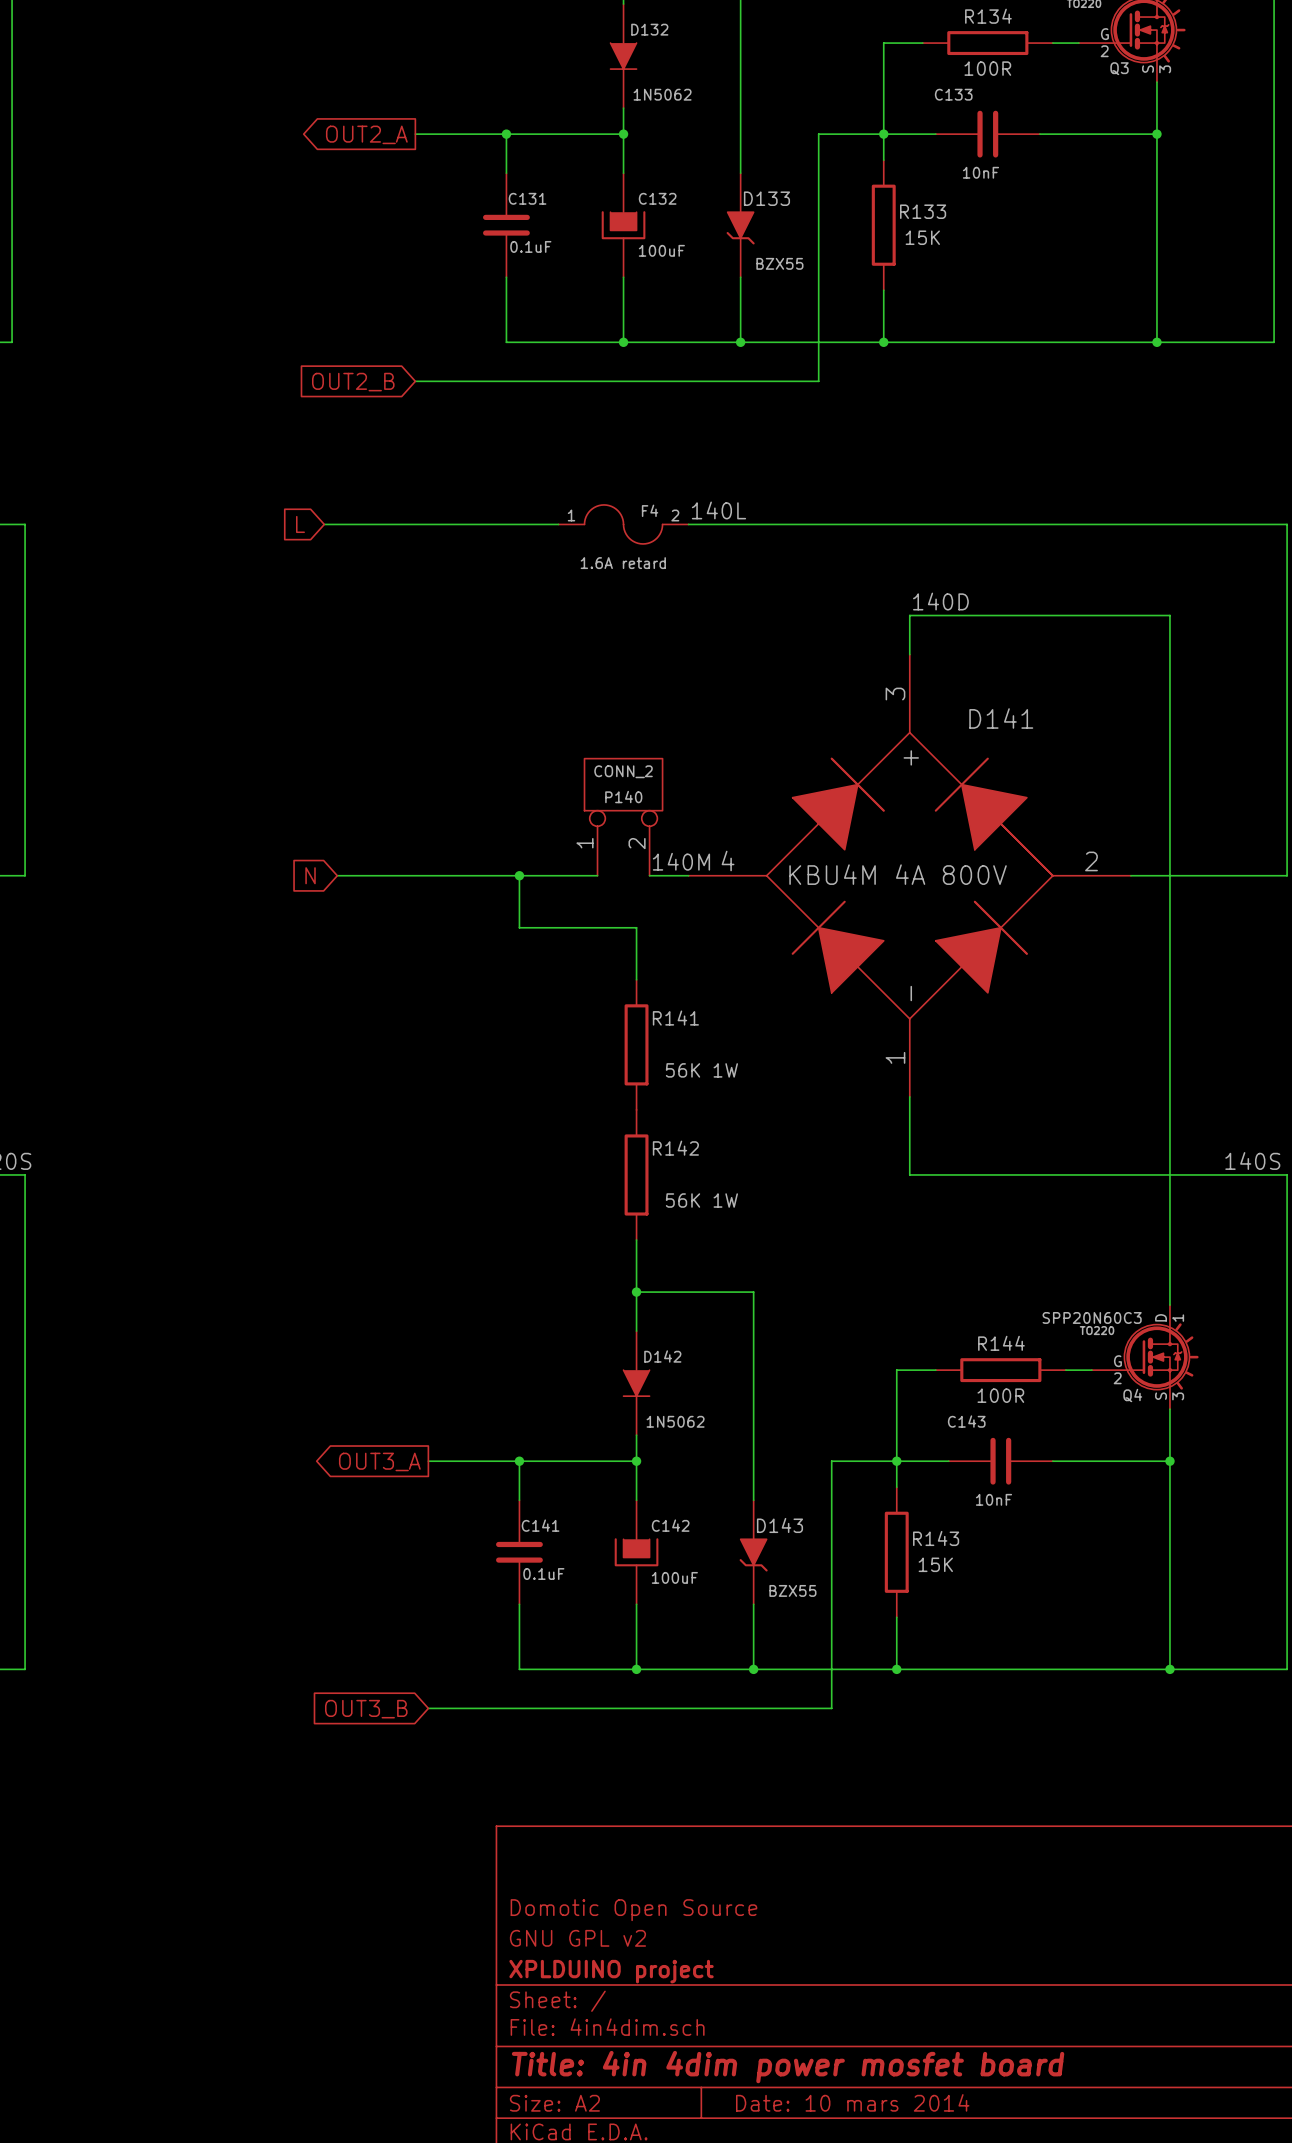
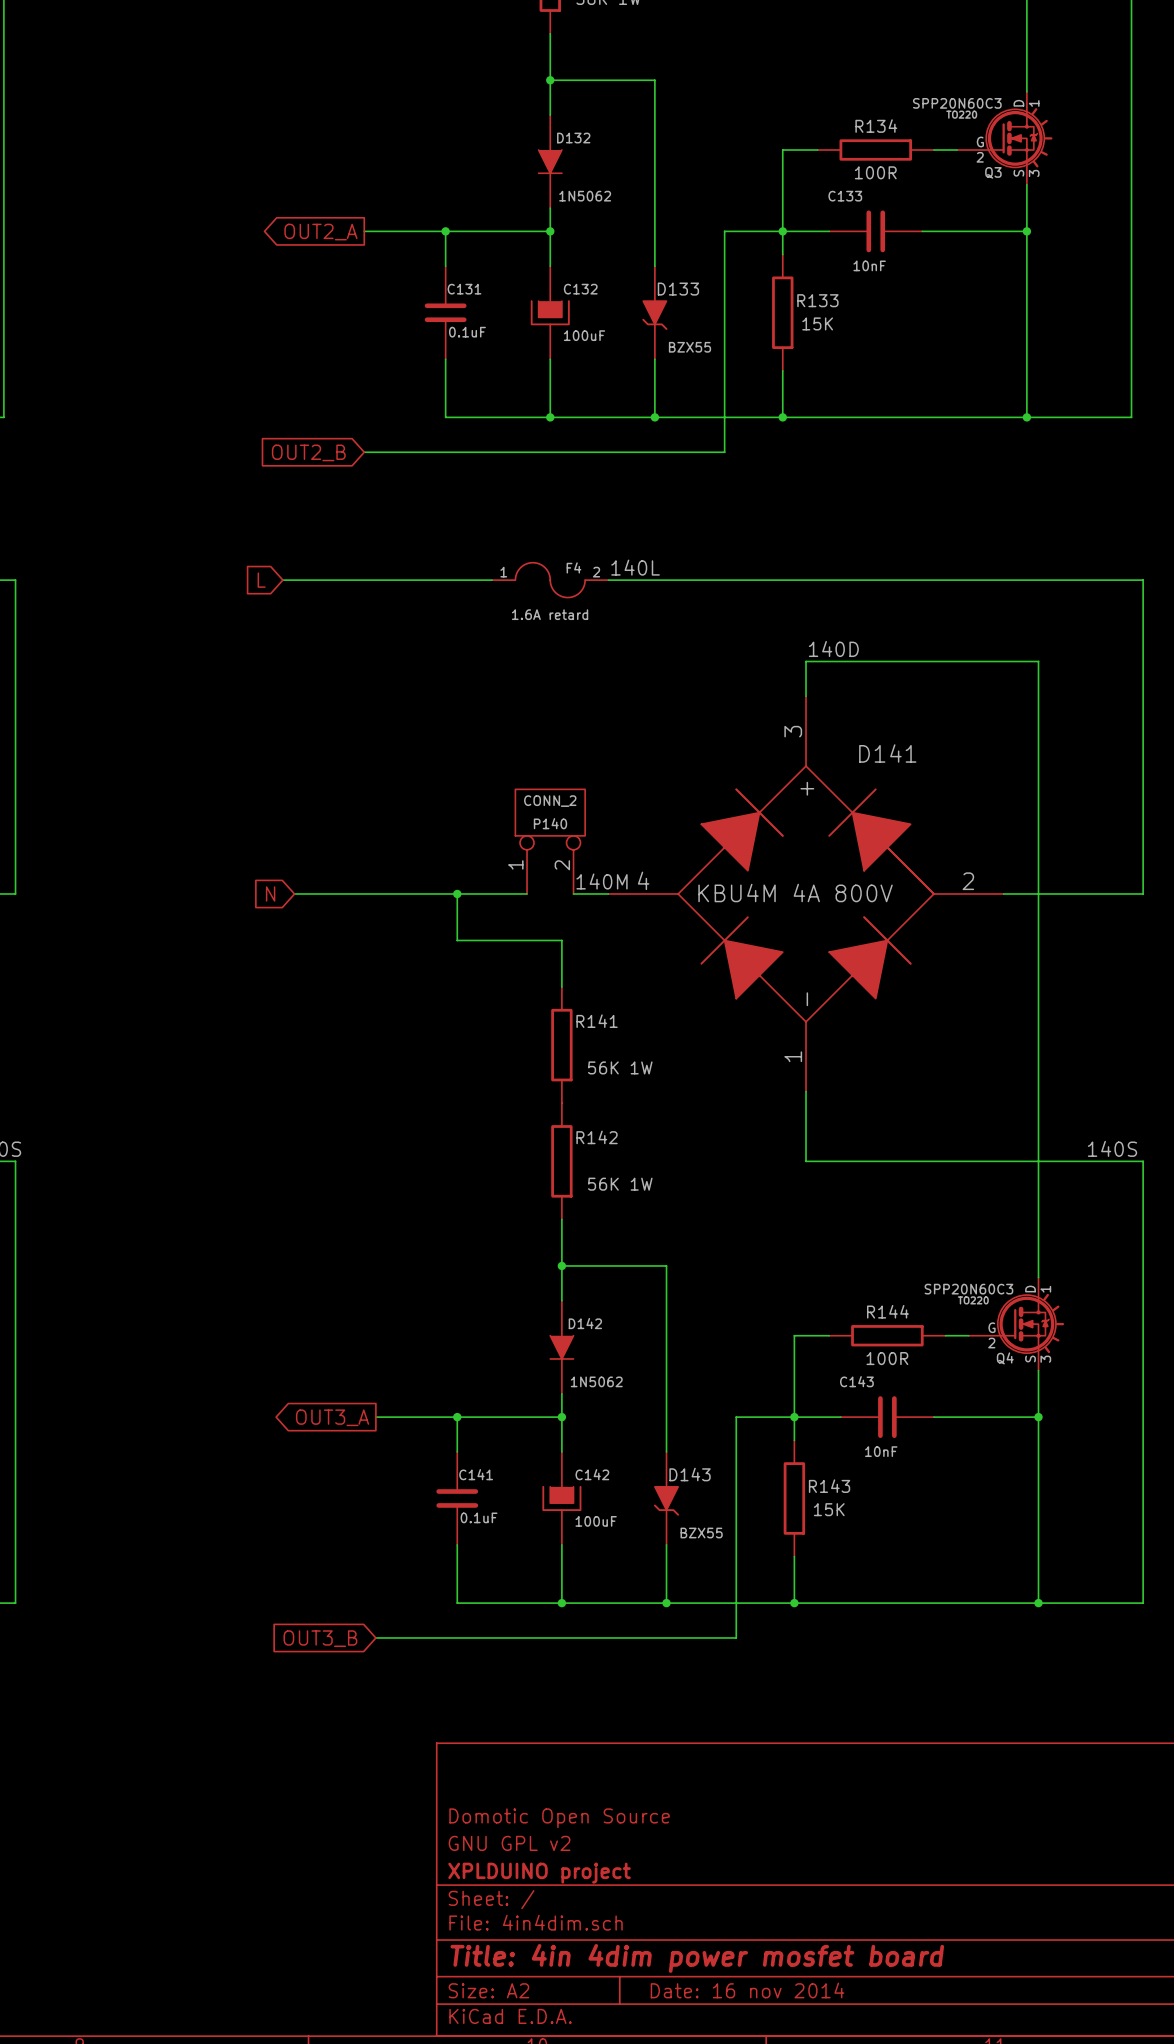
title block: Date: 10 mars 2014 (852, 2102) -> Date: 16 nov 2014 (747, 1990)

